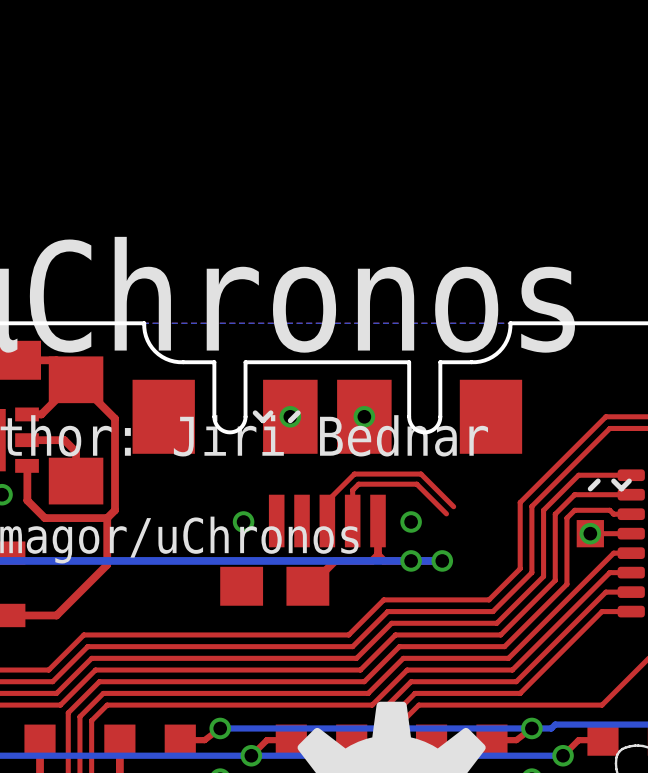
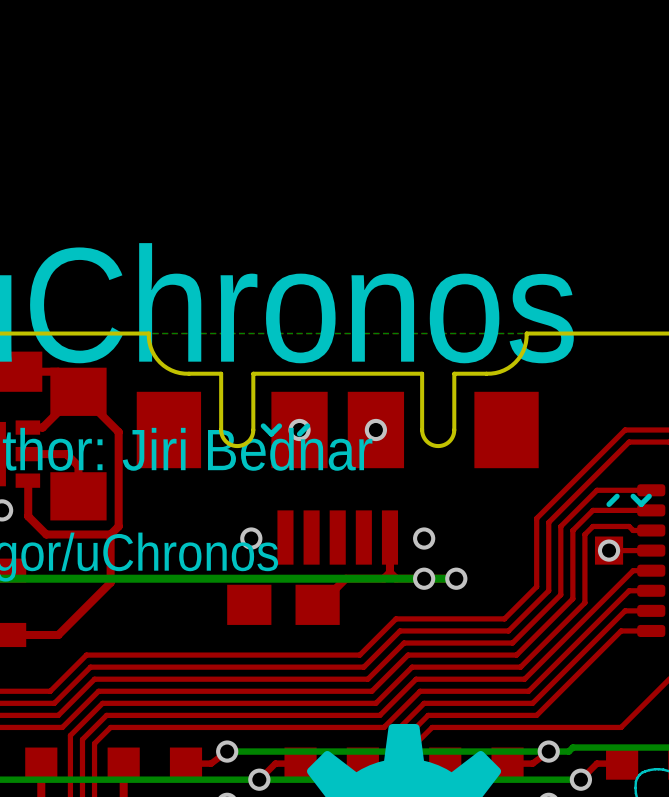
top track: (453, 506) (421, 474) (354, 474) (327, 501) (327, 521) -> none
top track: (446, 513) (416, 484) (358, 484) (352, 490) (352, 521) -> none

